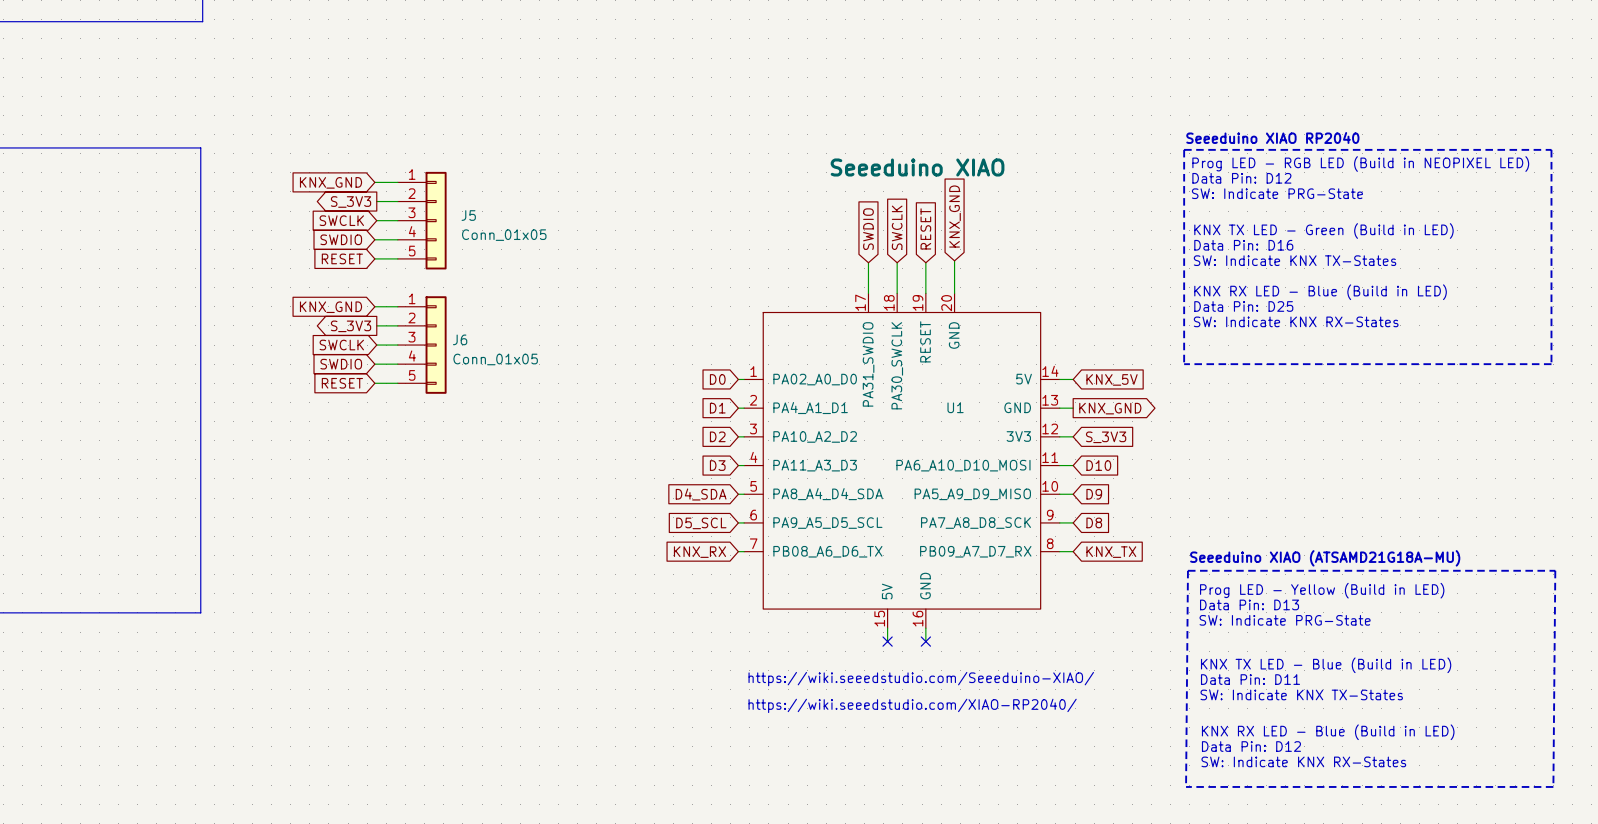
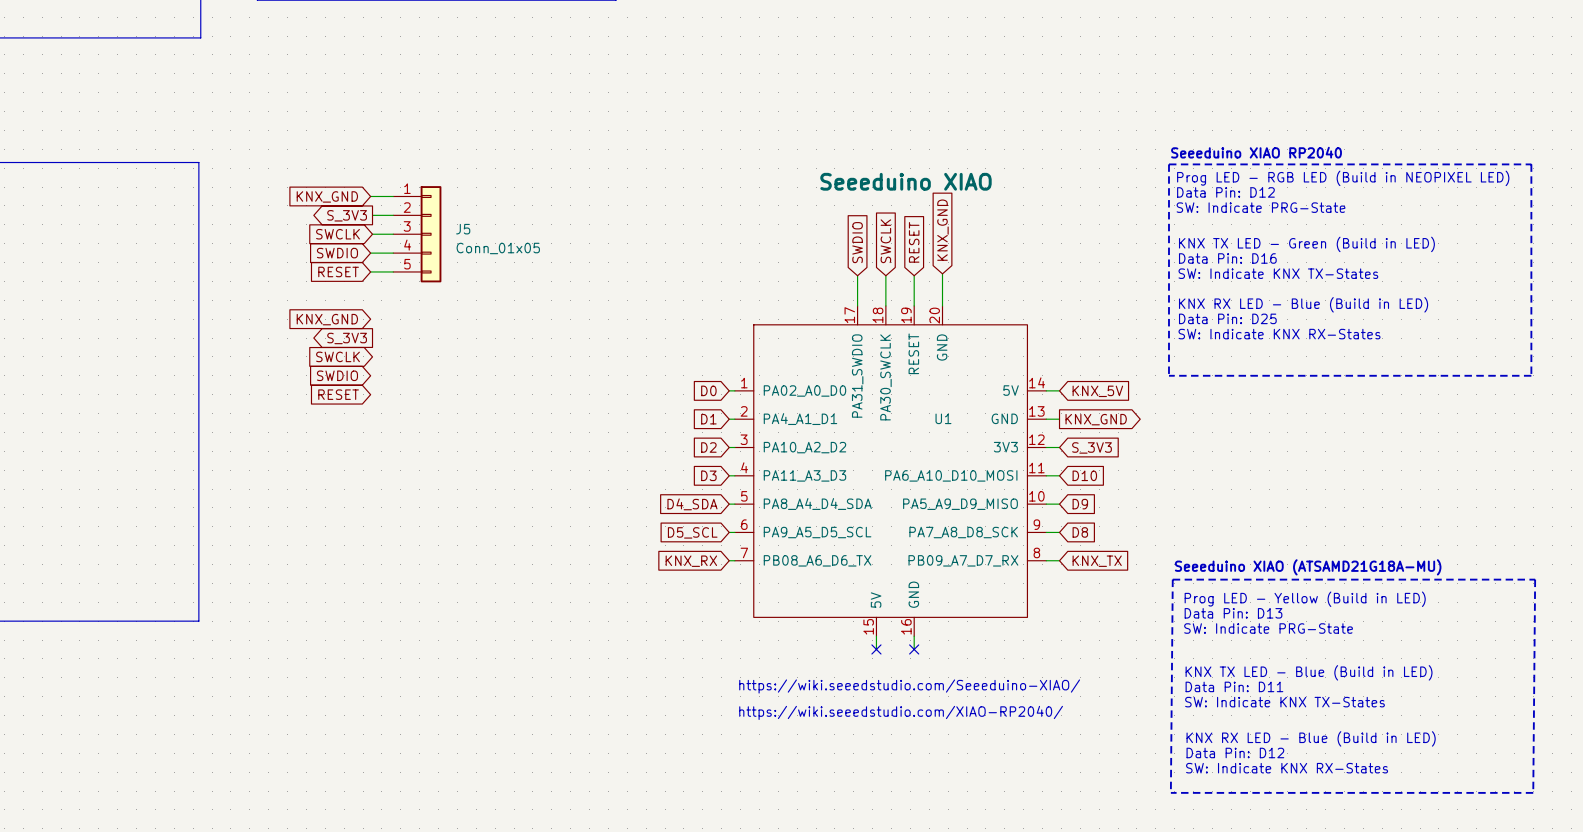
wire: (374, 306) (397, 306) -> none
wire: (376, 325) (397, 325) -> none
wire: (376, 345) (397, 345) -> none
J6: Conn_01x05 (422, 345) -> none
wire: (374, 364) (397, 364) -> none
wire: (374, 383) (397, 383) -> none

